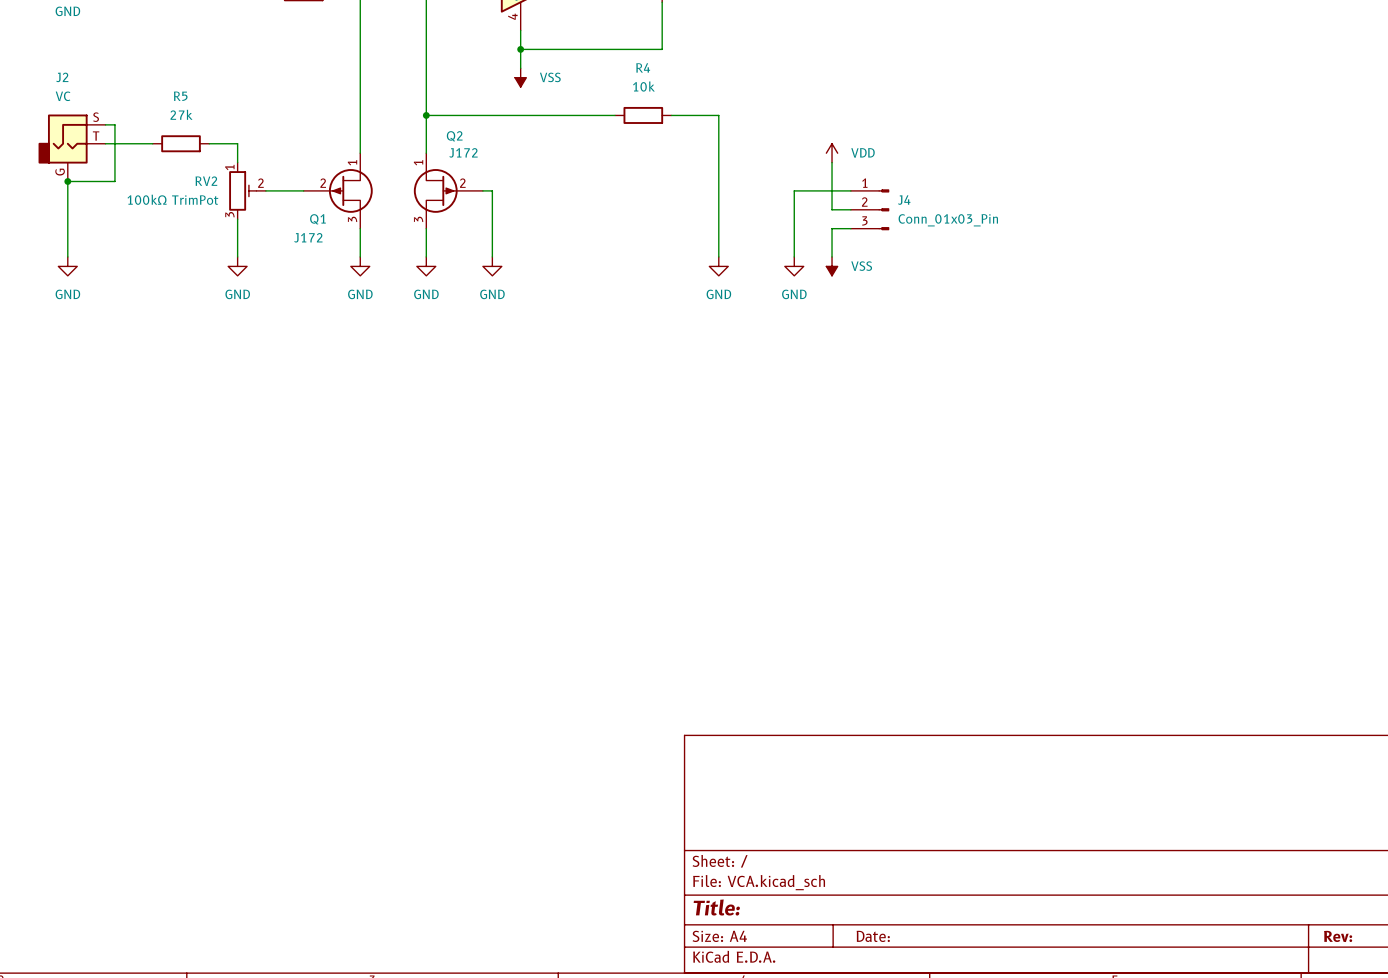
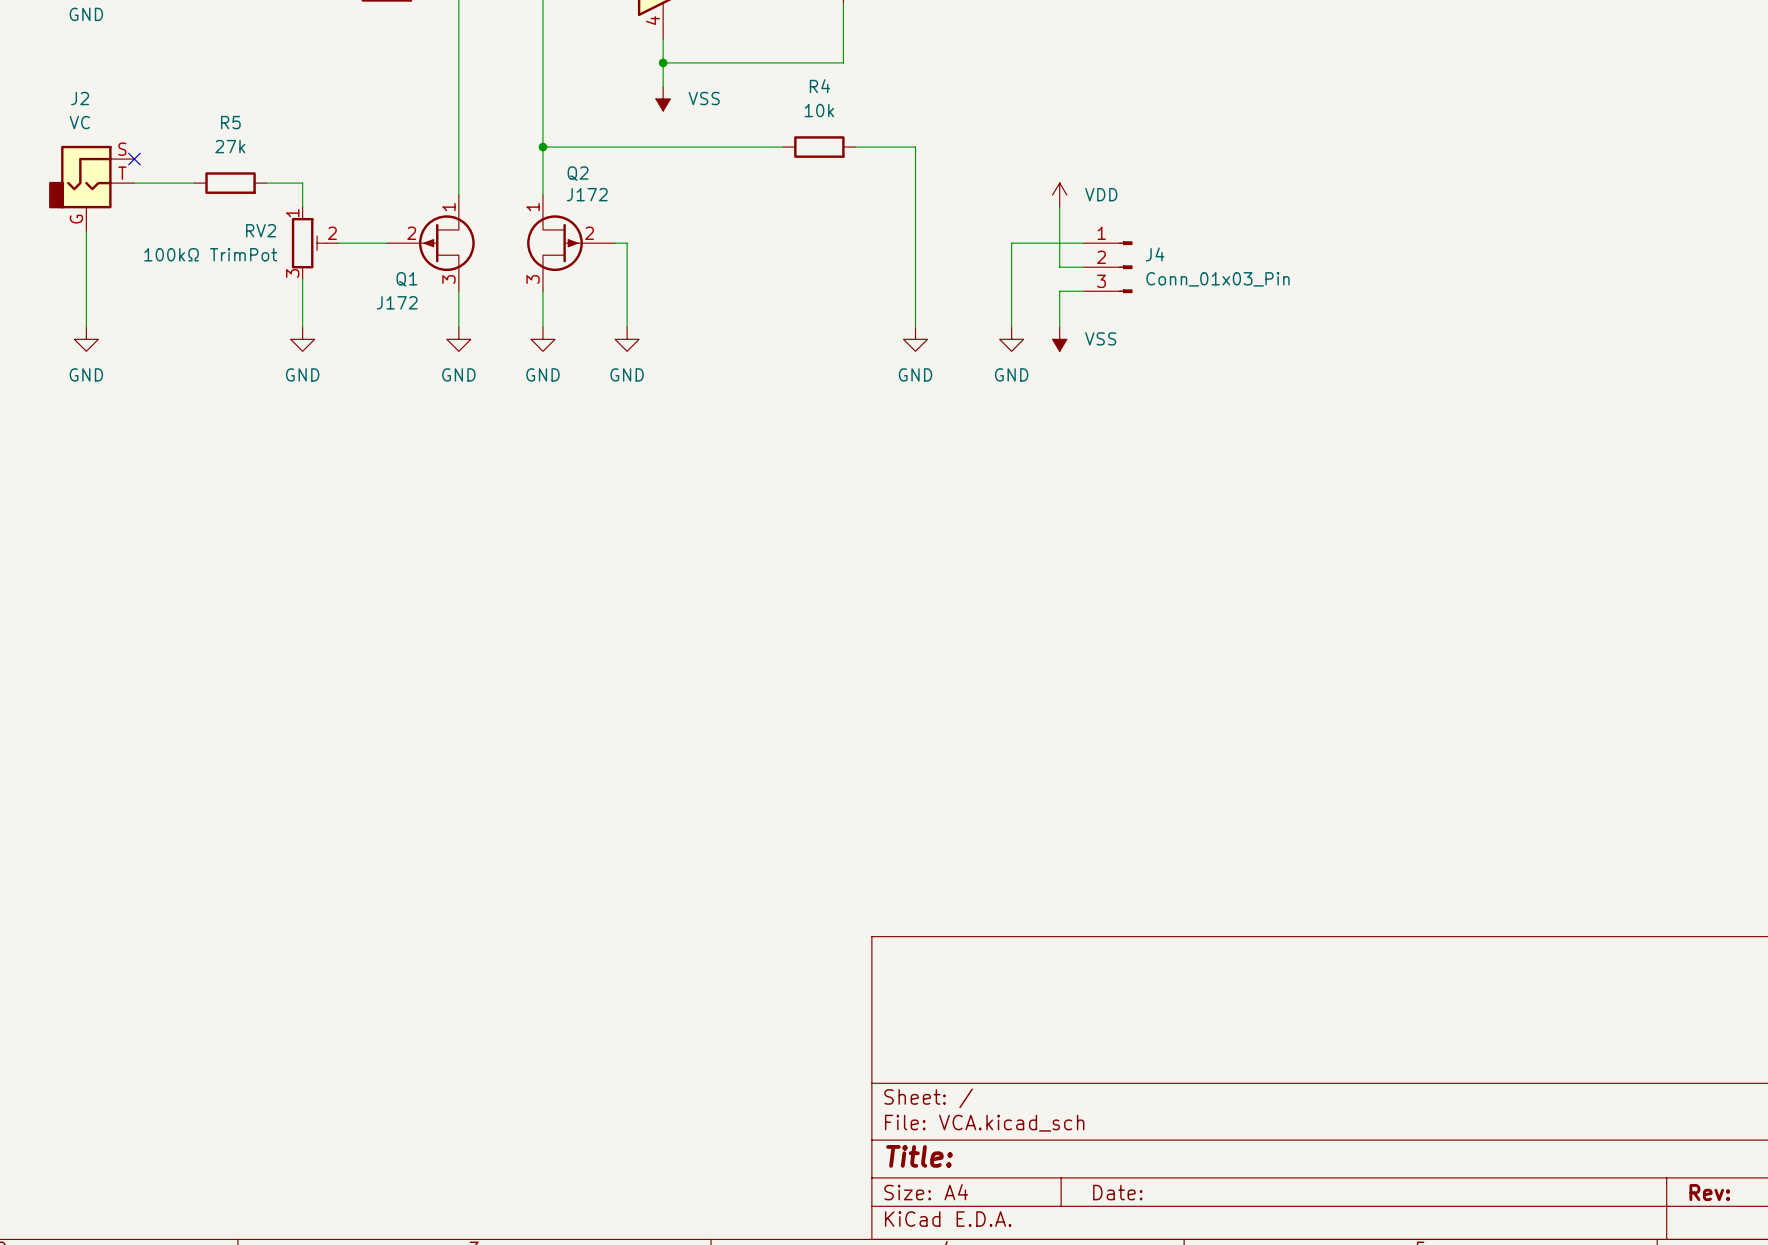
wire: (105, 124) (114, 124) (114, 181) (67, 181) -> none
no-connect mark: none -> (134, 159)
junction: (67, 181) -> none

